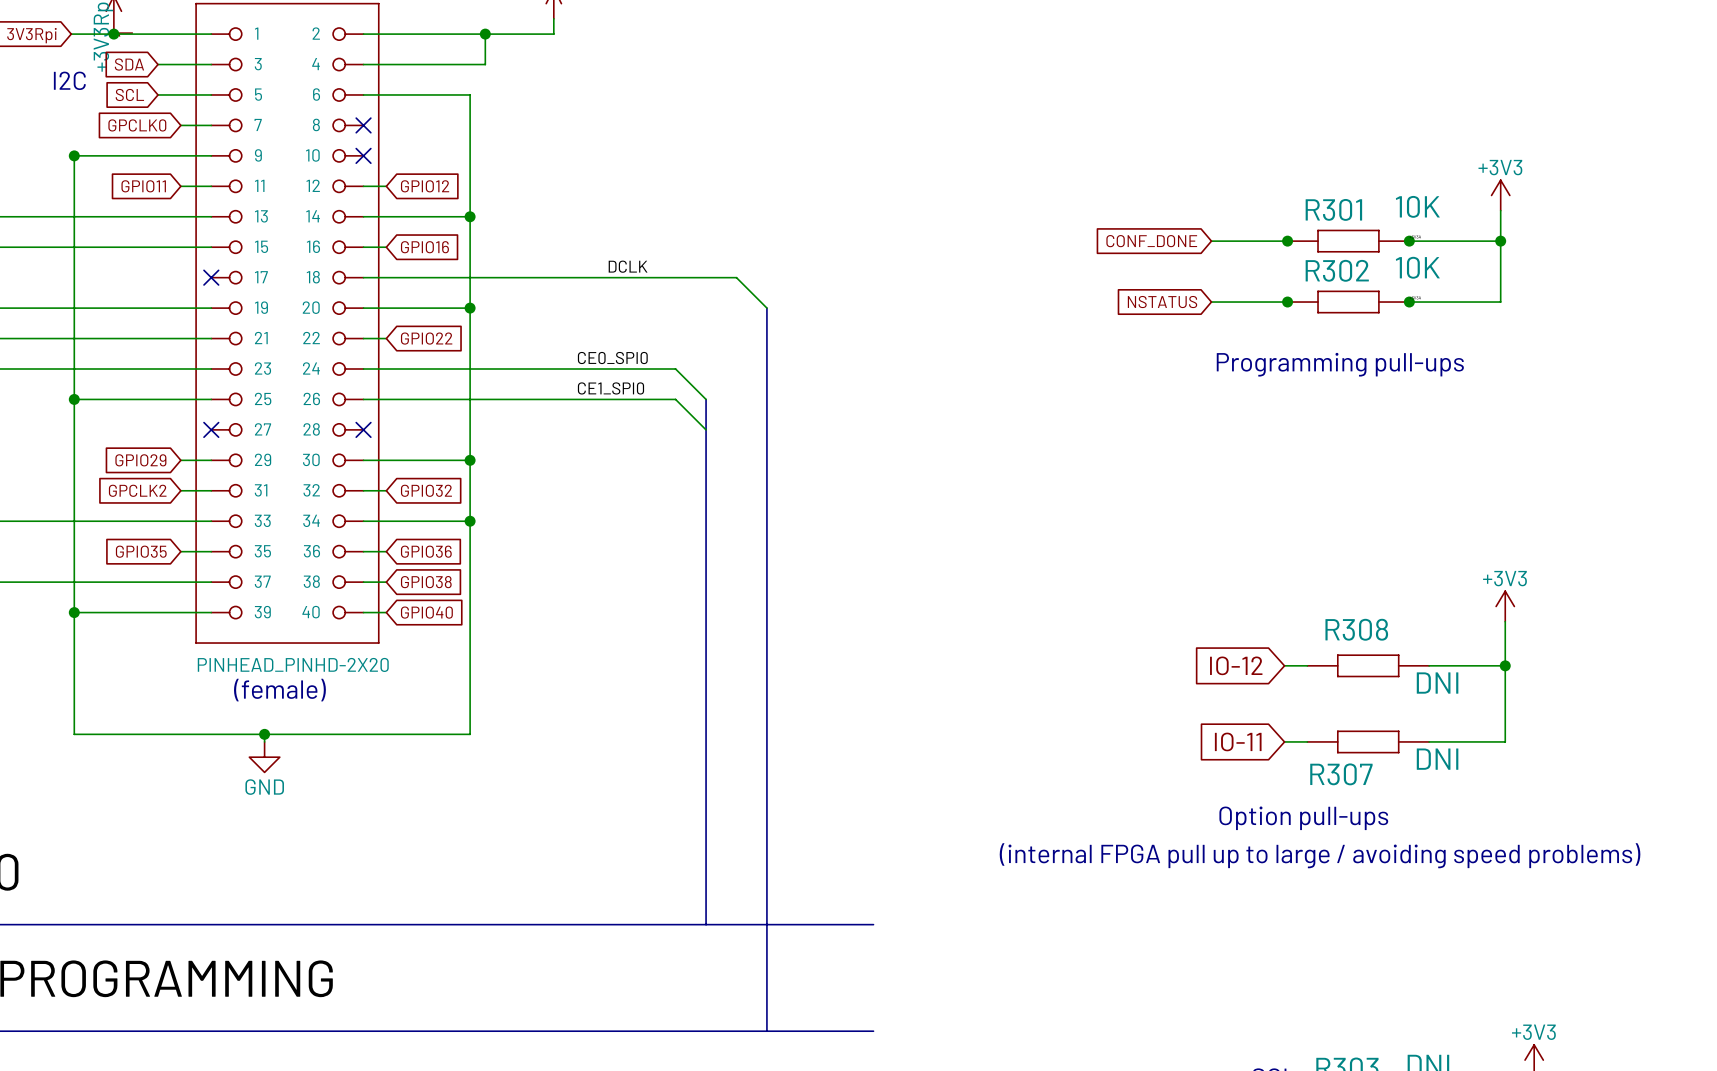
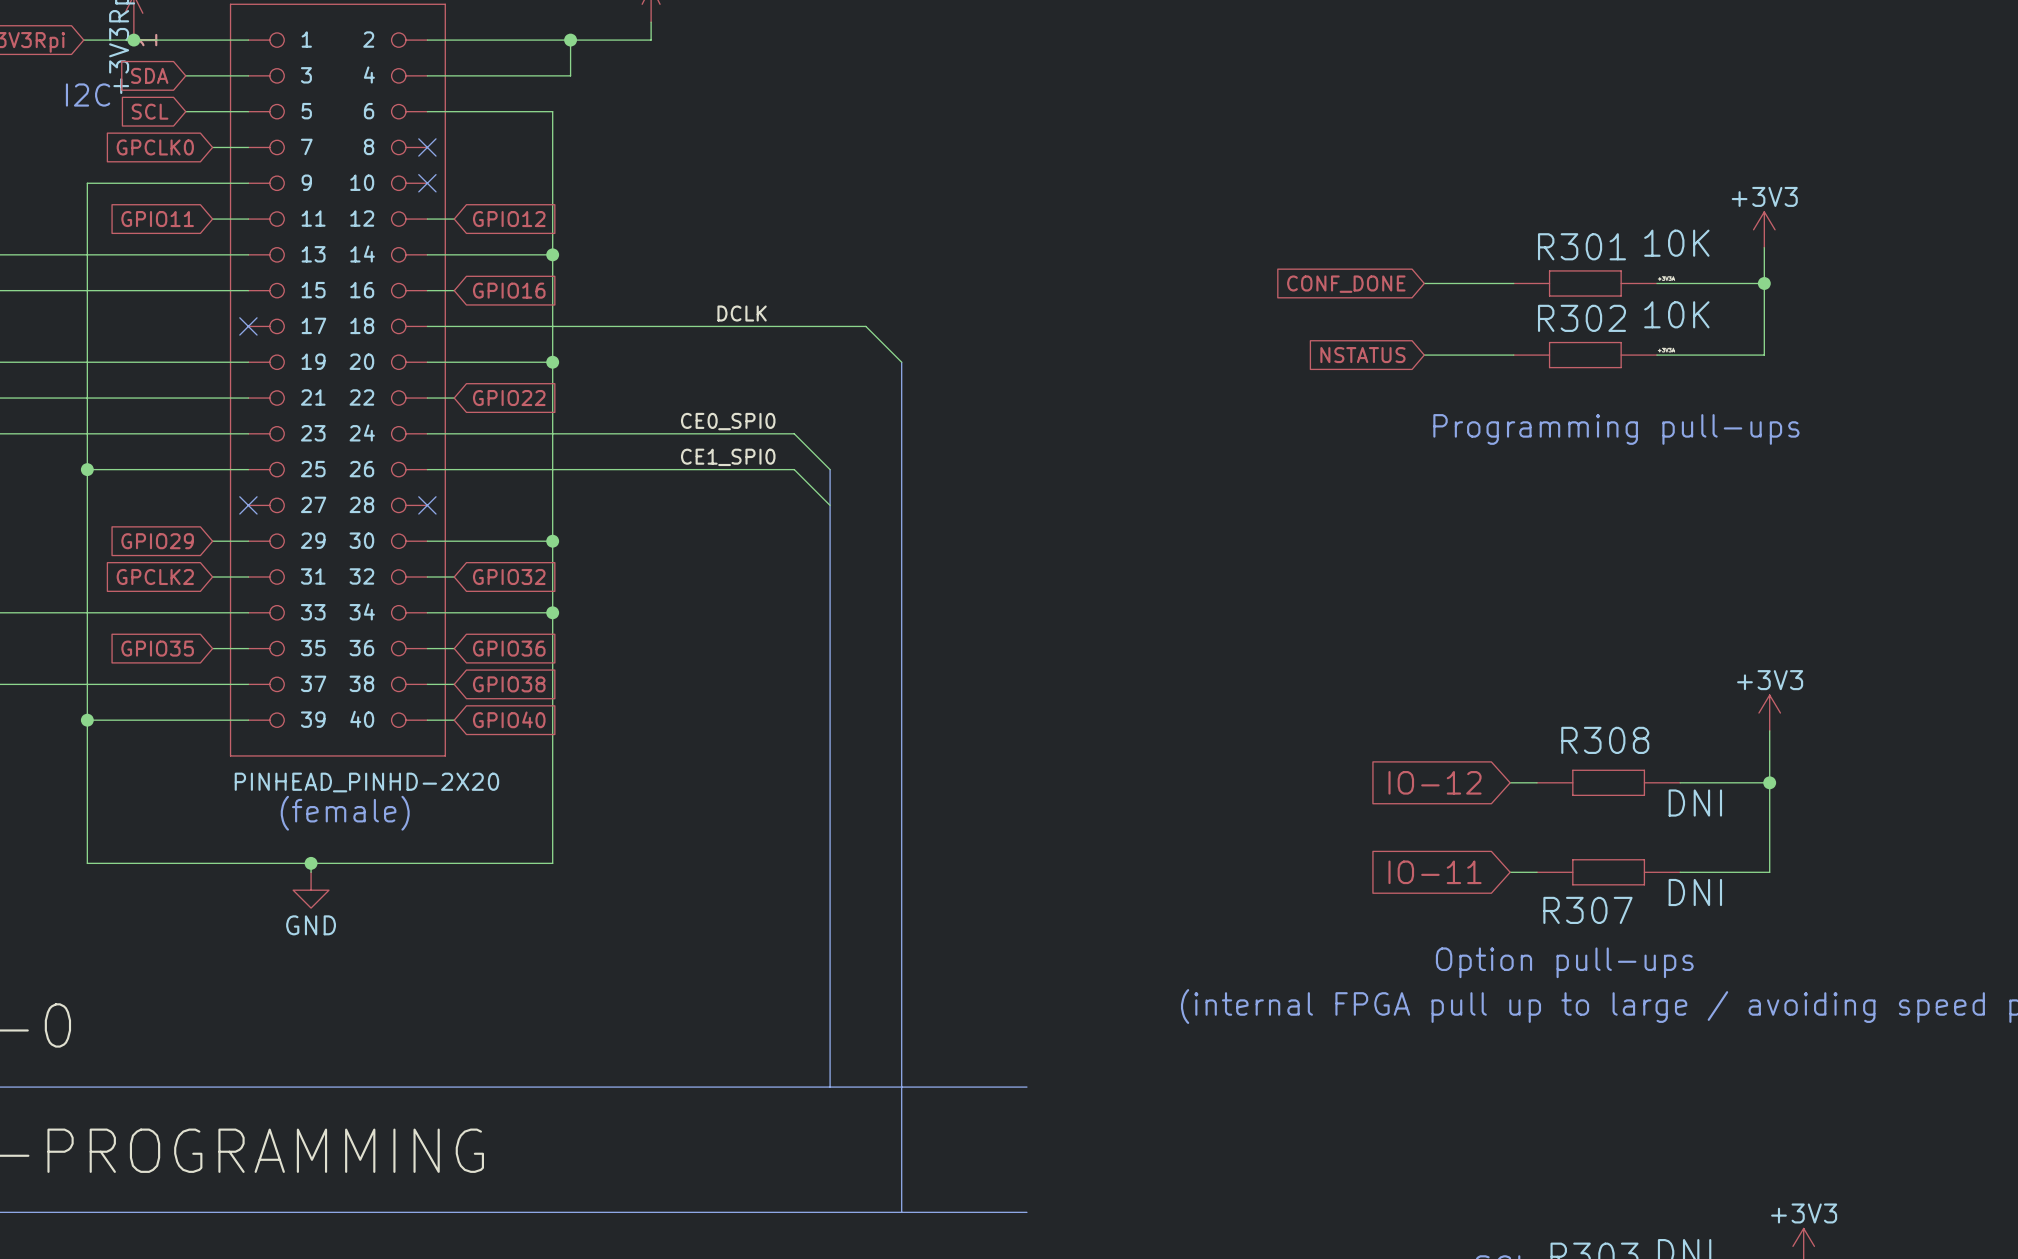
junction: (74, 155) -> none
junction: (1287, 241) -> none
junction: (1409, 241) -> none
junction: (1287, 302) -> none
junction: (1409, 302) -> none

